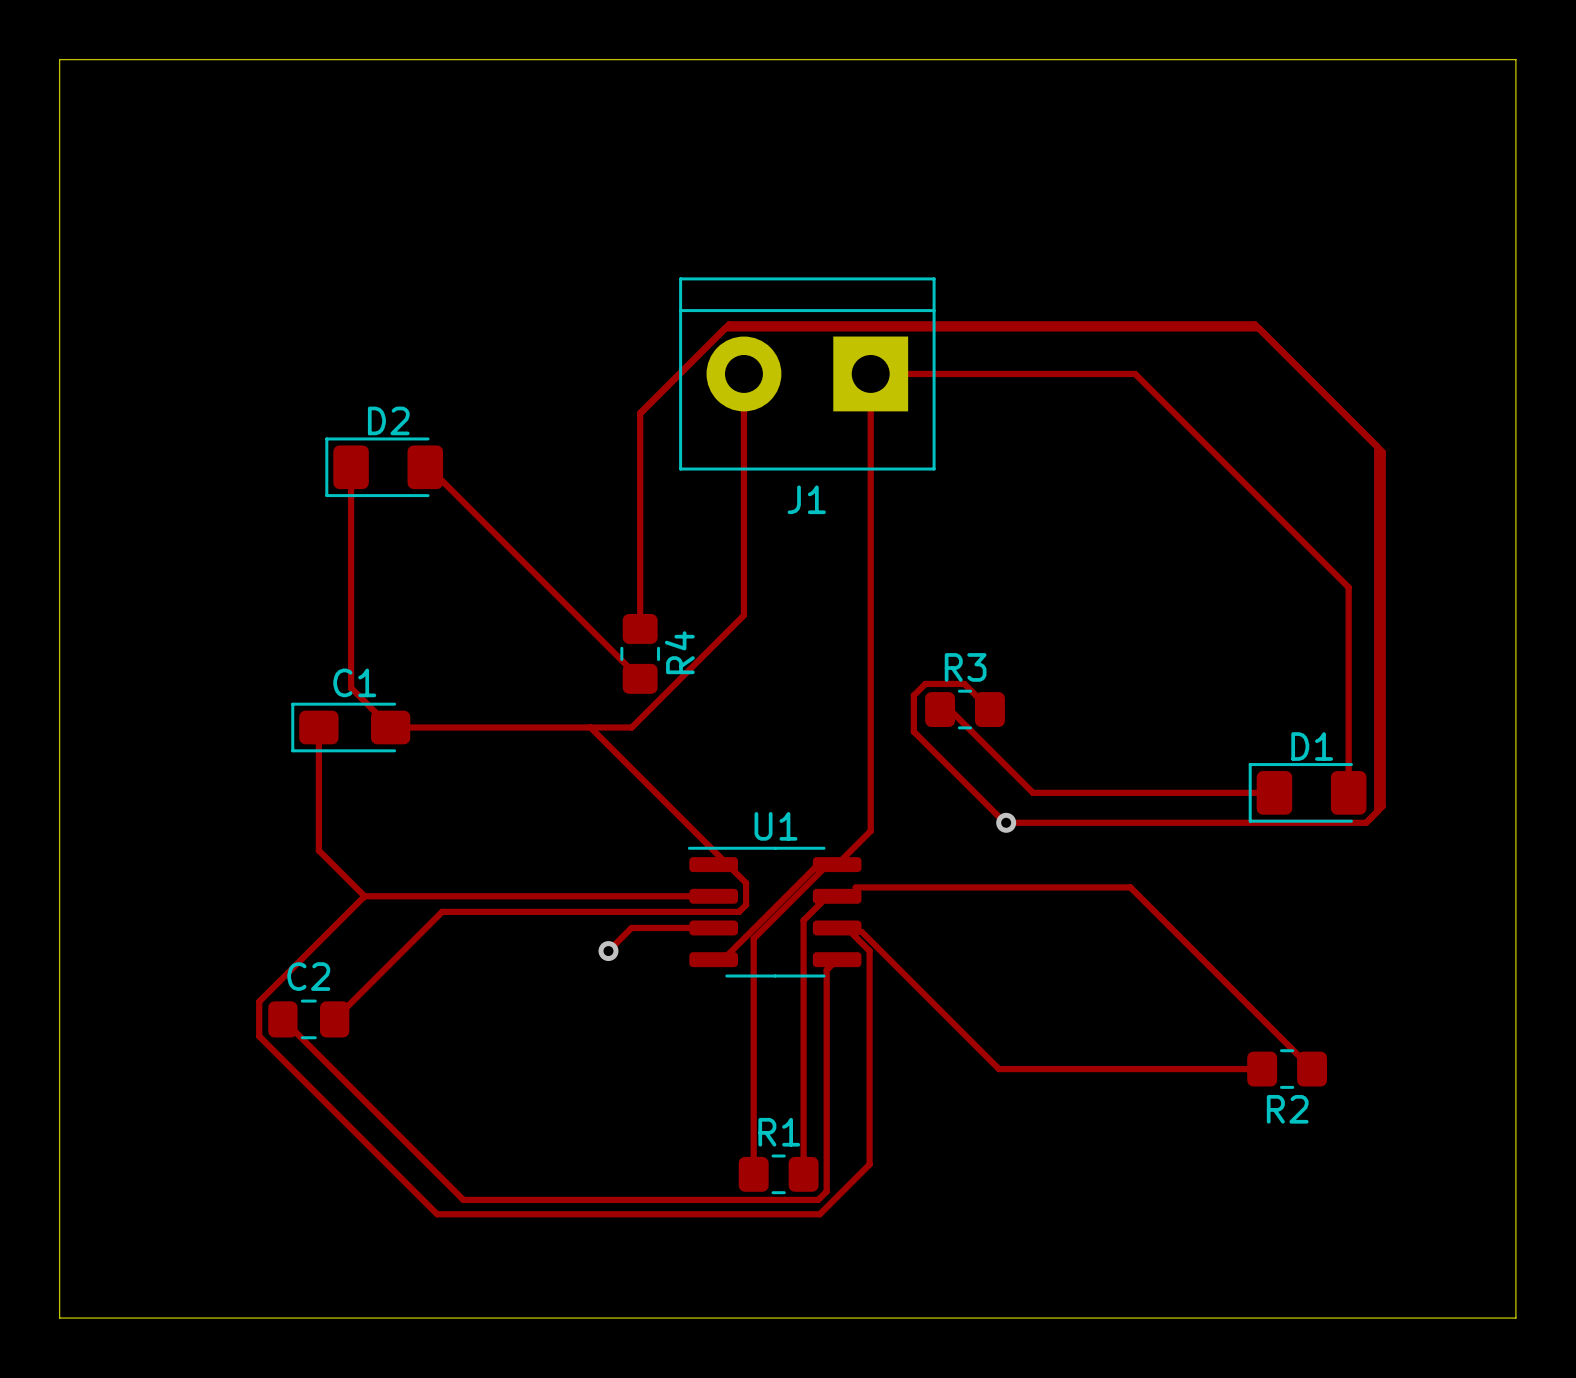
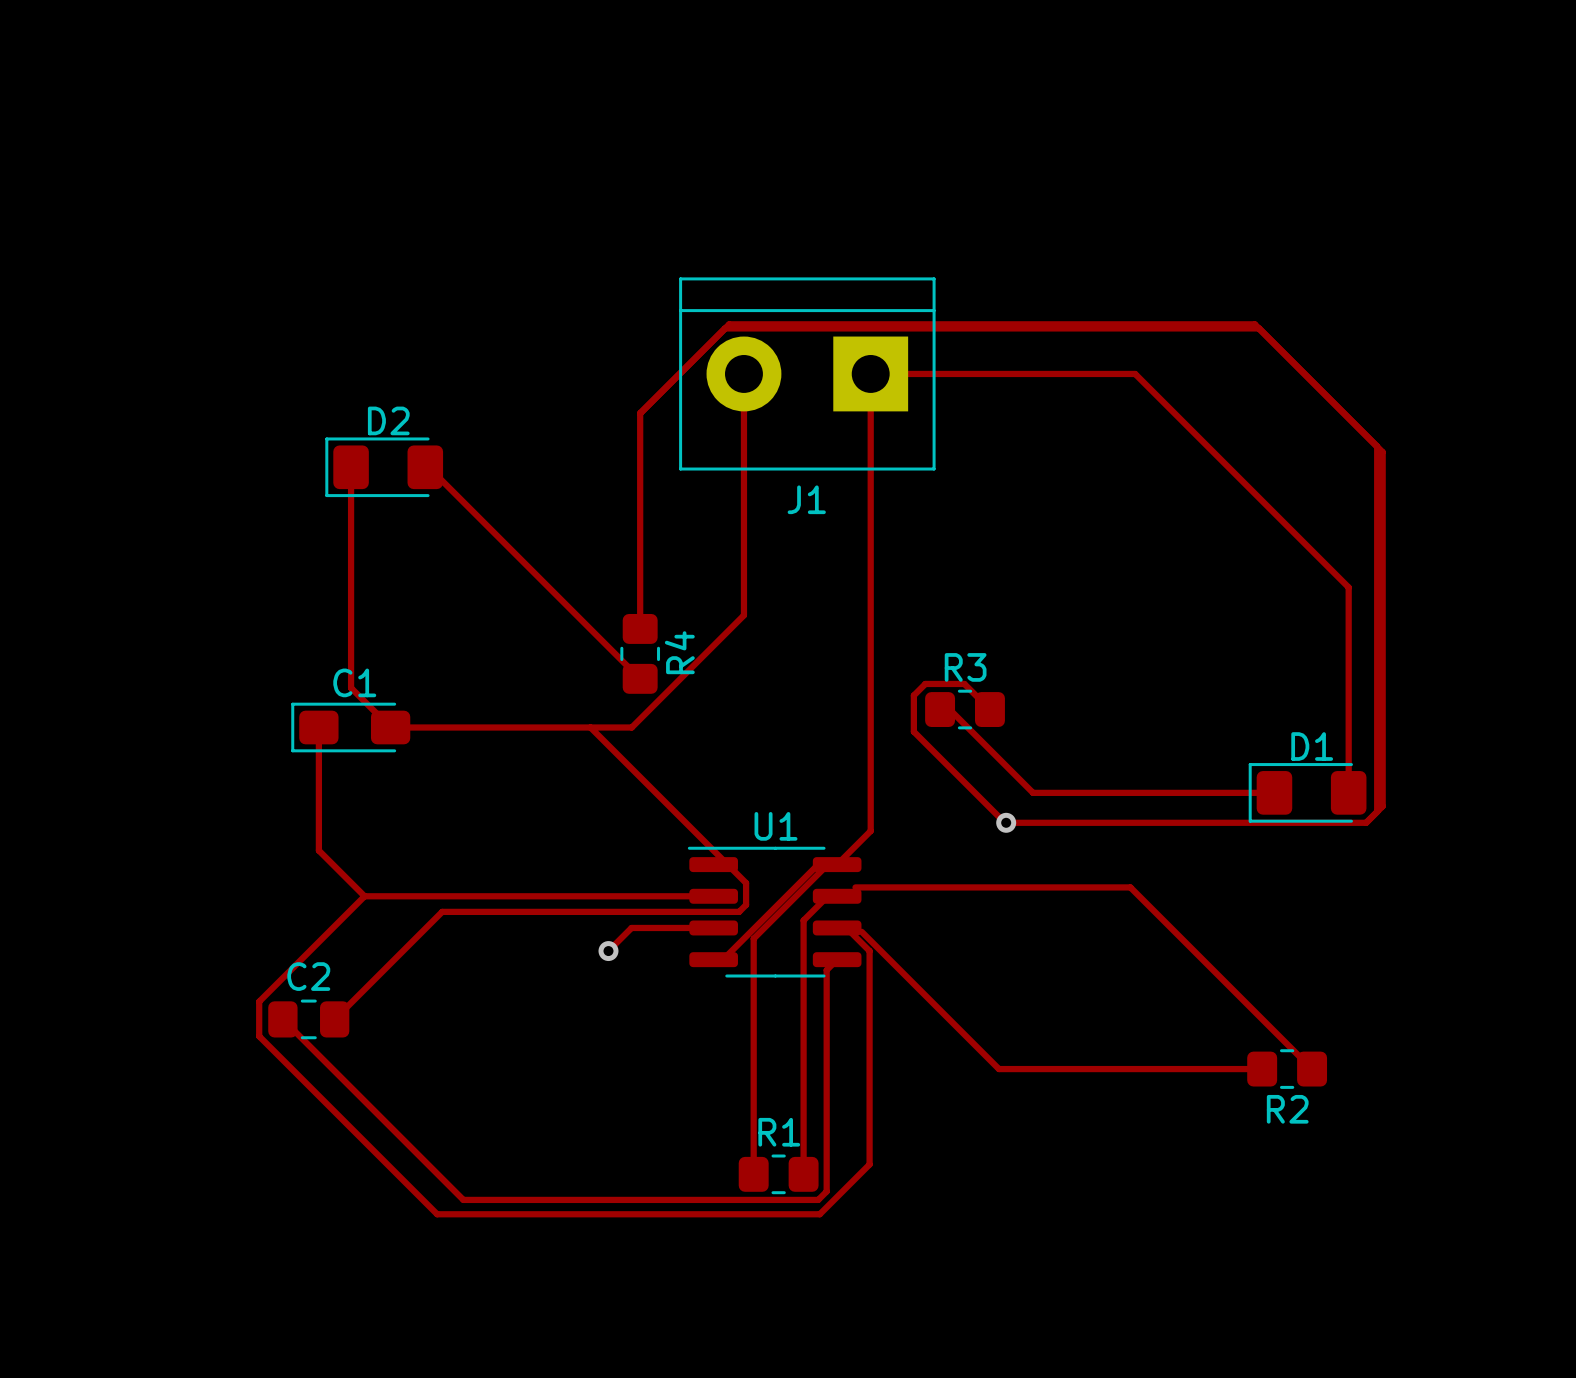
board edge: (59, 59) (1515, 59) (1515, 1318) (59, 1318) (59, 59) -> none

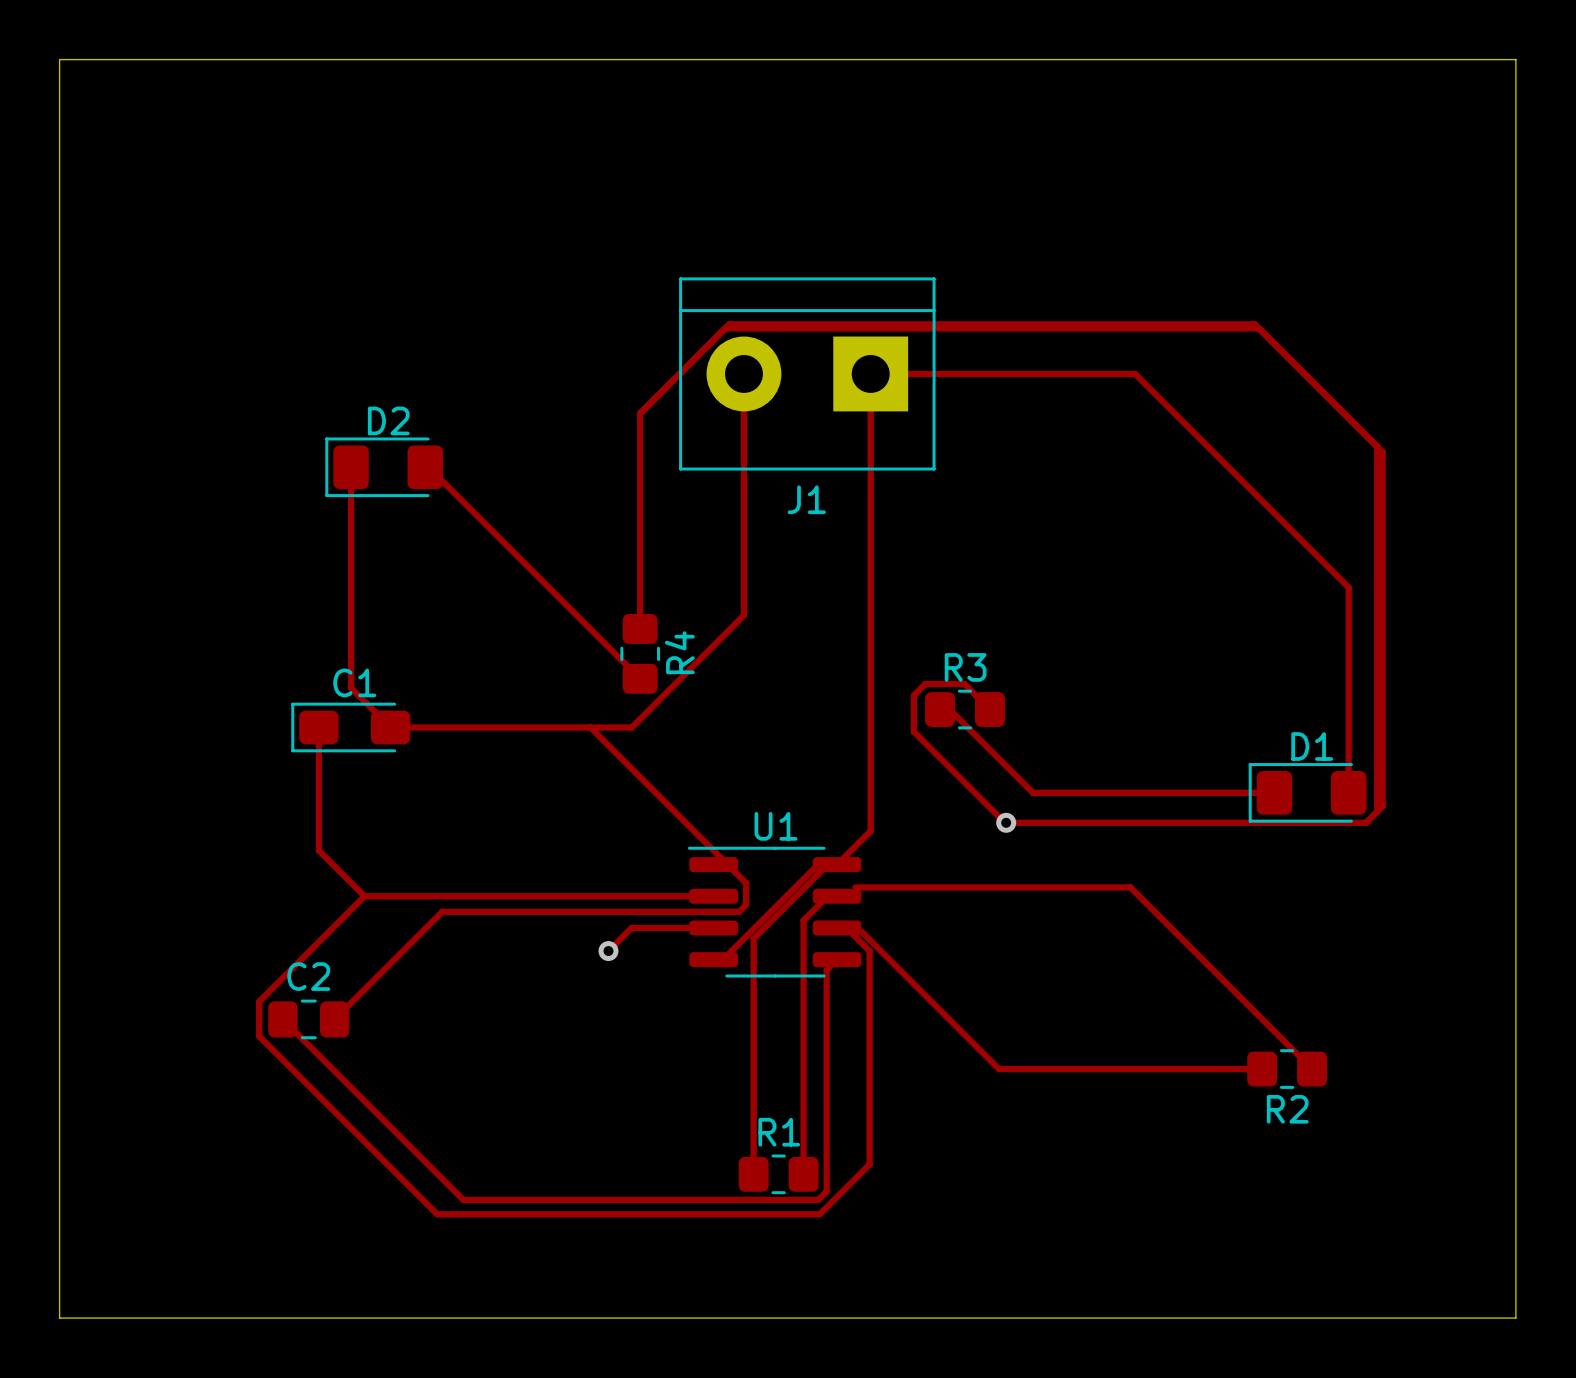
board edge: none -> (59, 59) (1515, 59) (1515, 1318) (59, 1318) (59, 59)

